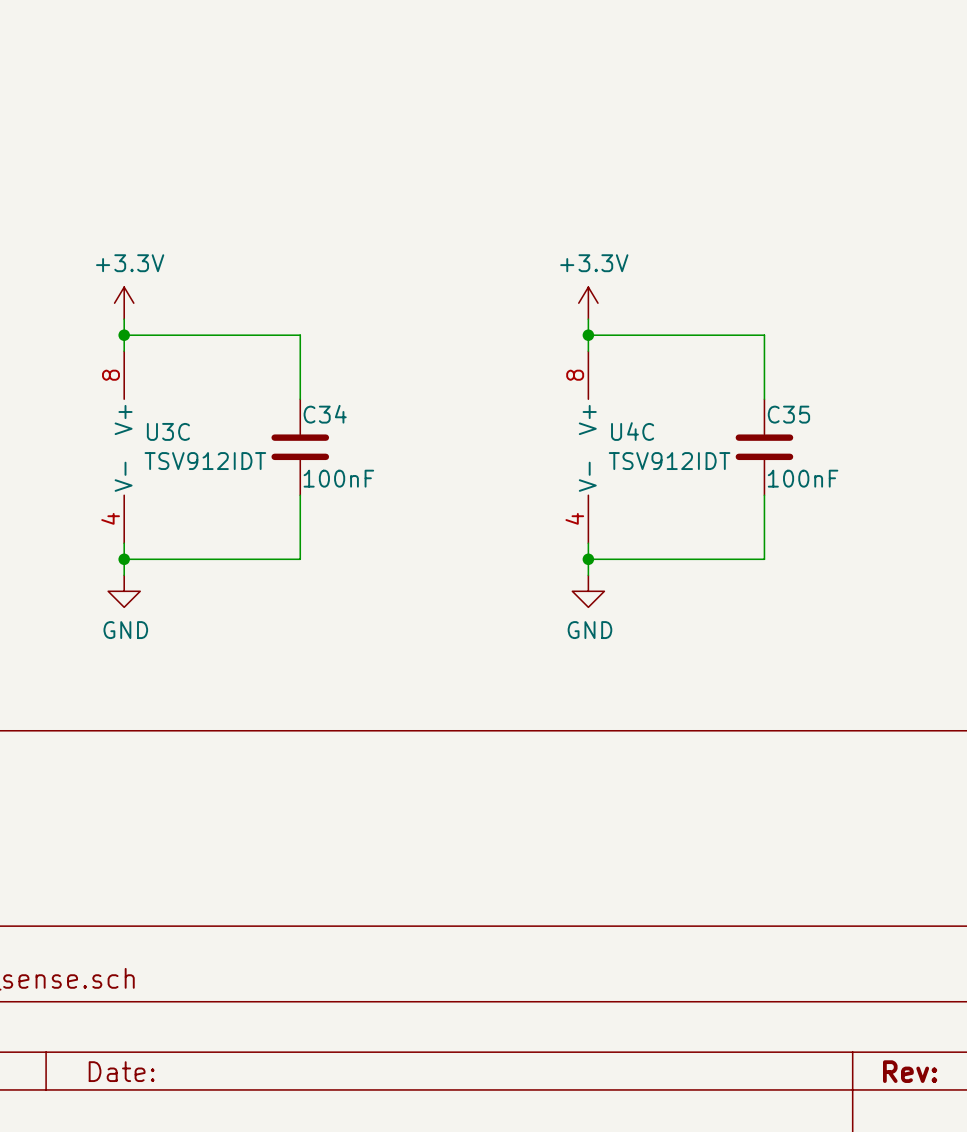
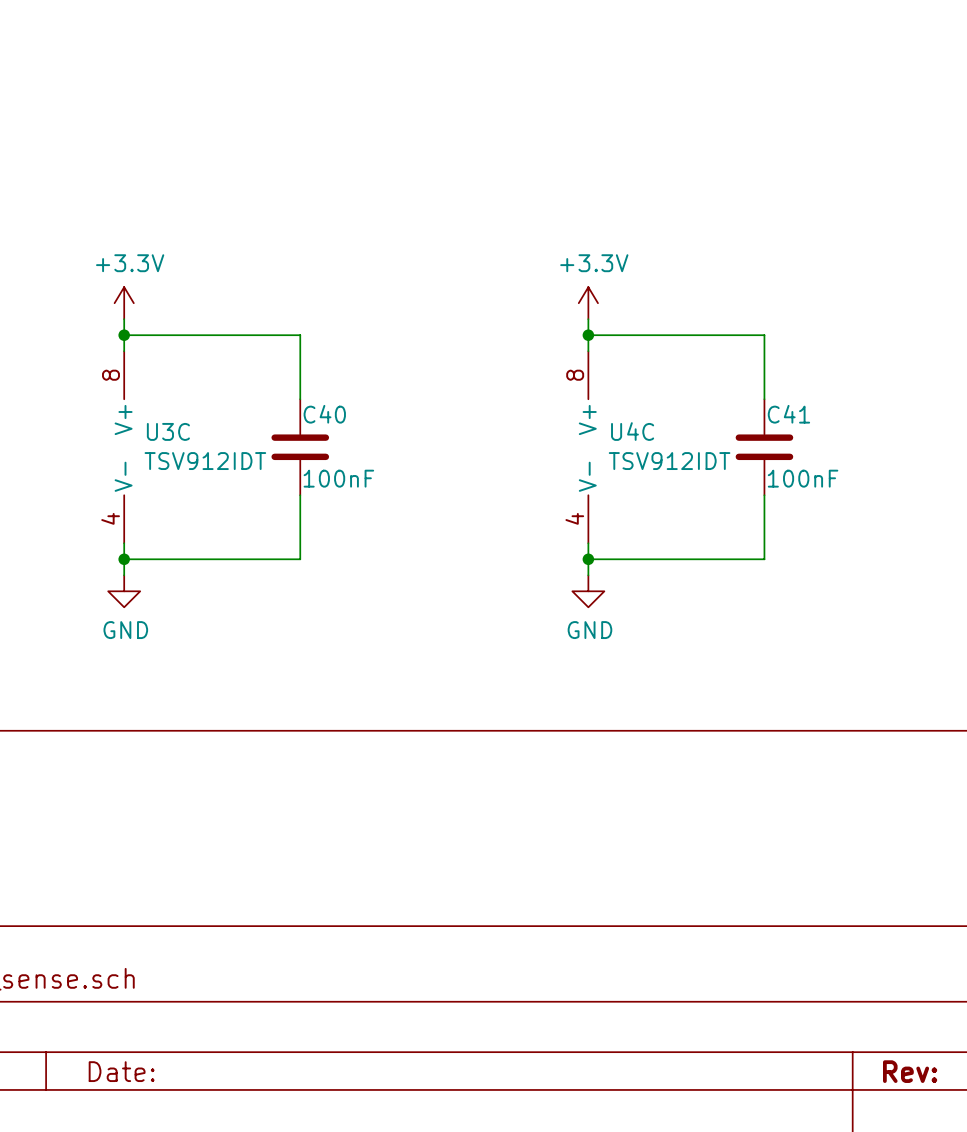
C34 name: C34 (325, 414) -> C40 (324, 414)
C35 name: C35 (788, 414) -> C41 (788, 414)

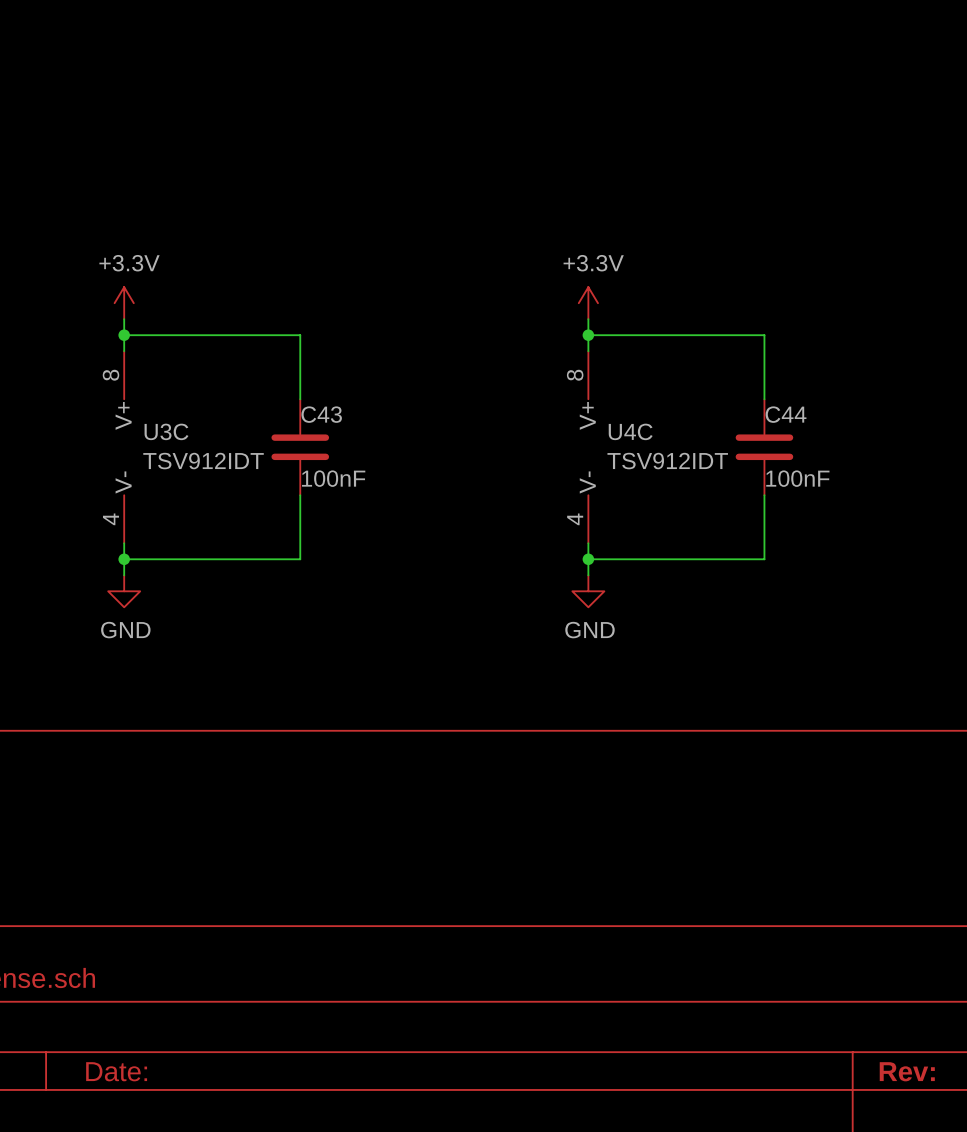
C40 name: C40 (324, 414) -> C43 (321, 414)
C41 name: C41 (788, 414) -> C44 (786, 414)

